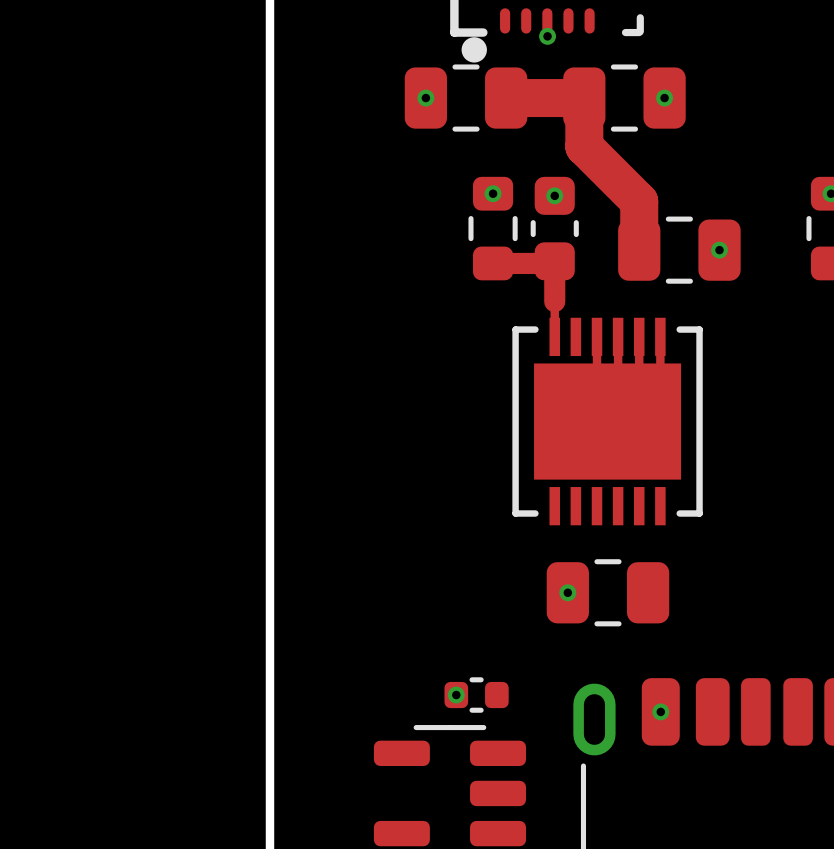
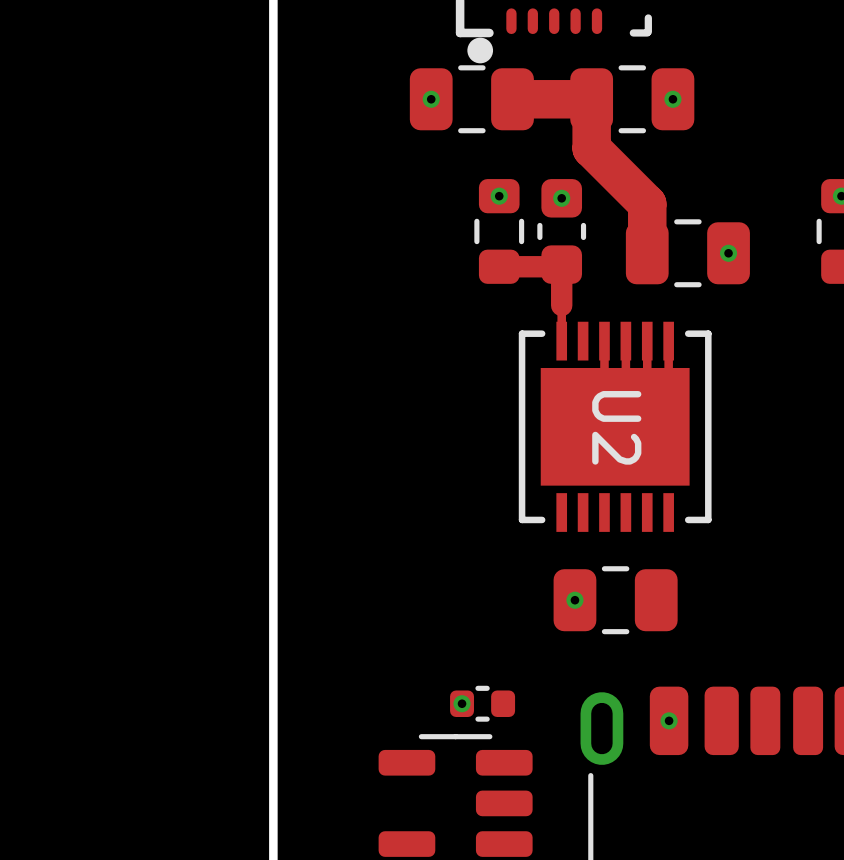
via: (547, 36) -> none
U2 name: none -> U2 (616, 427)

